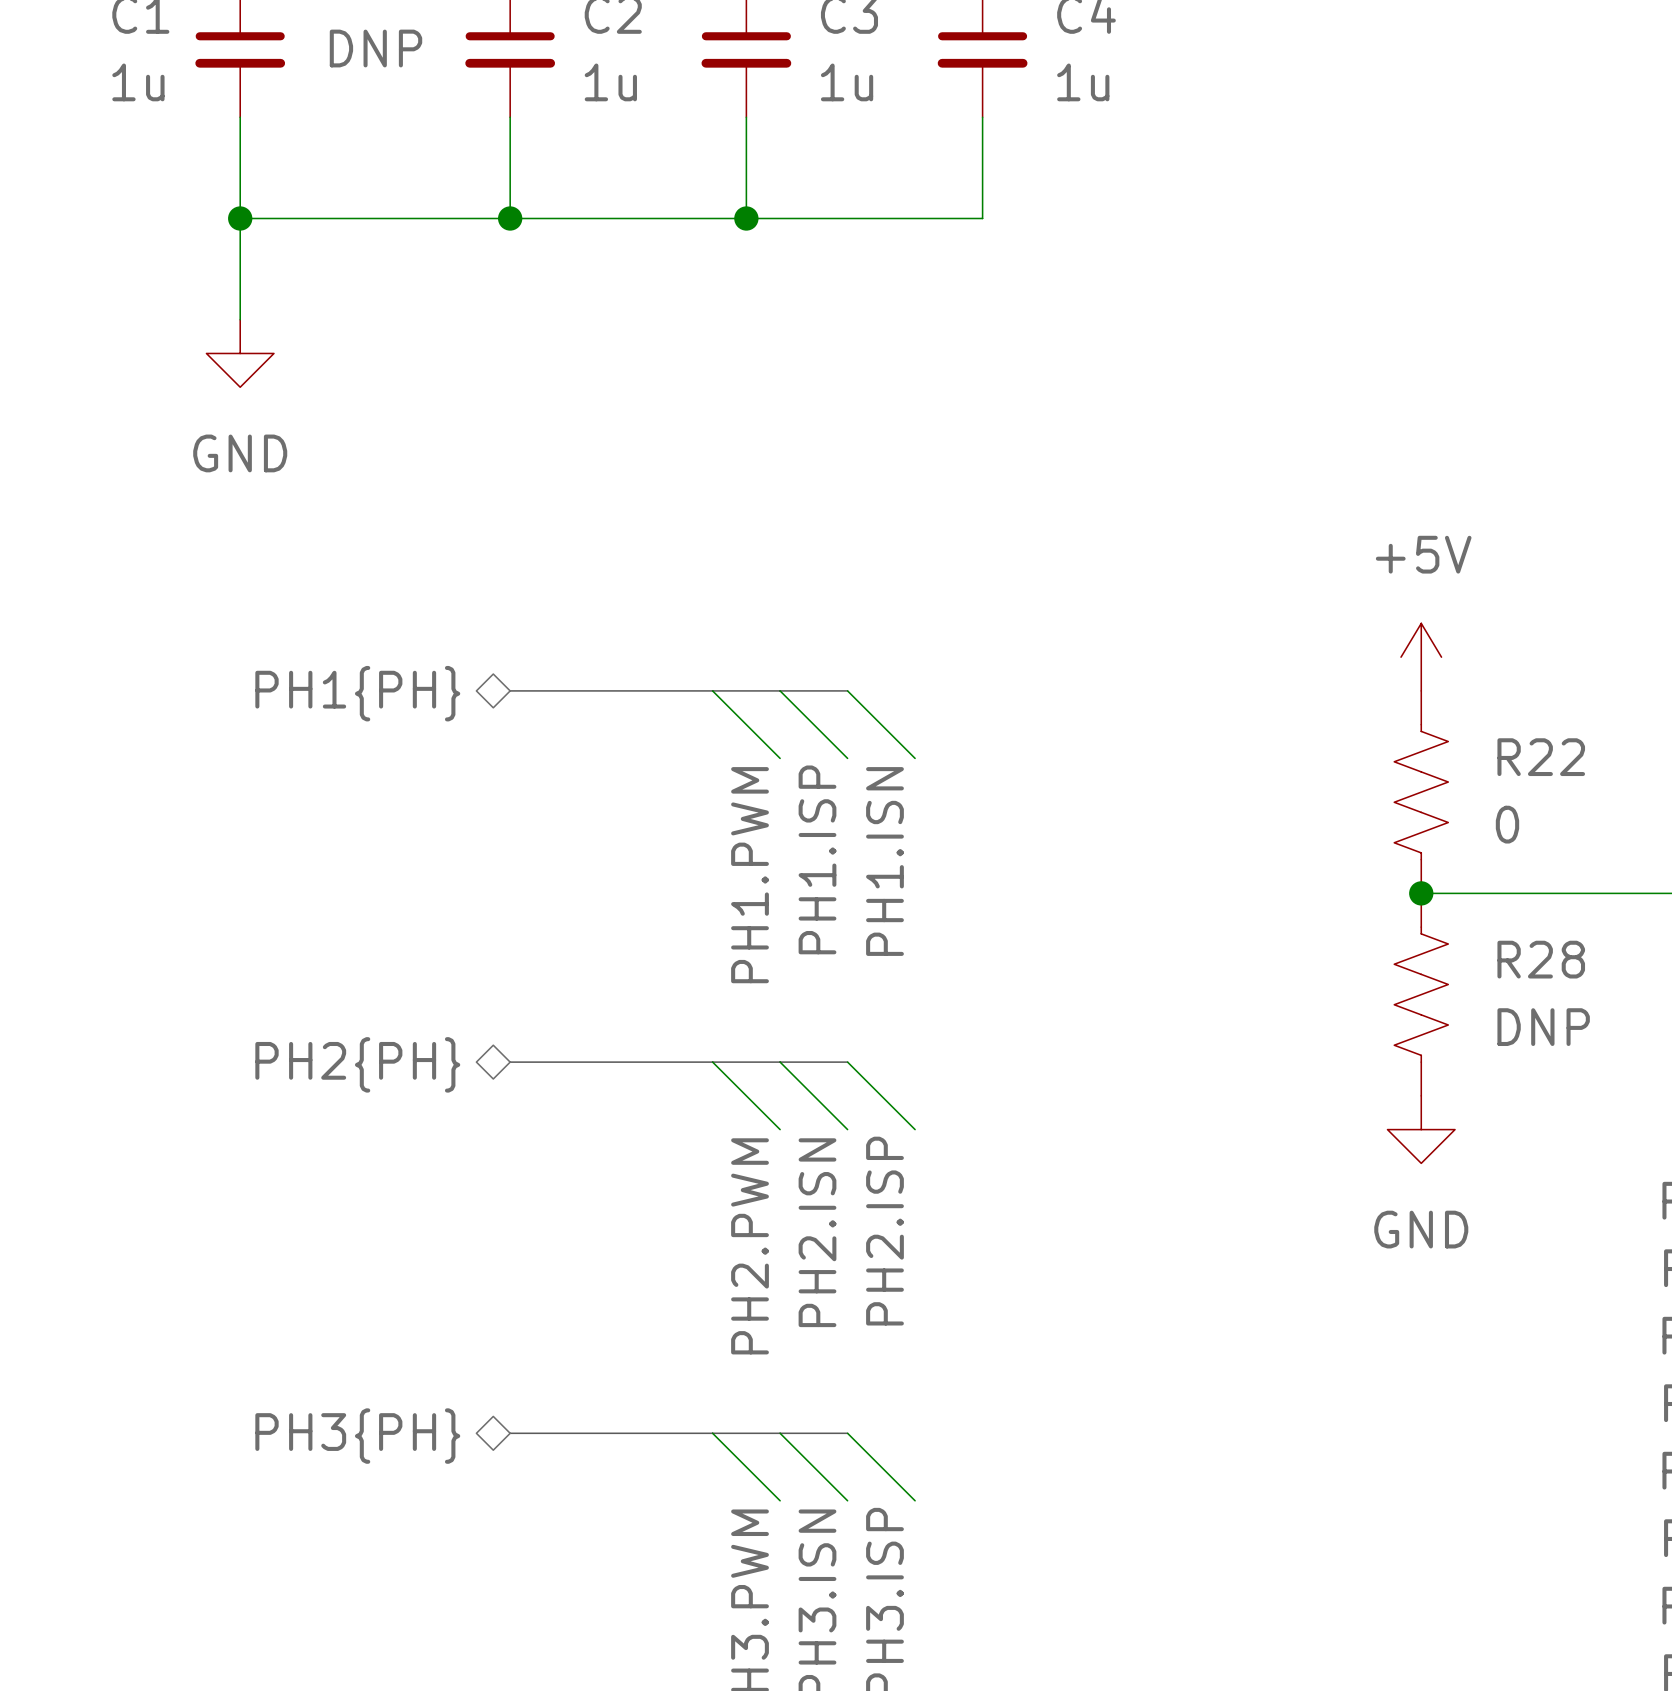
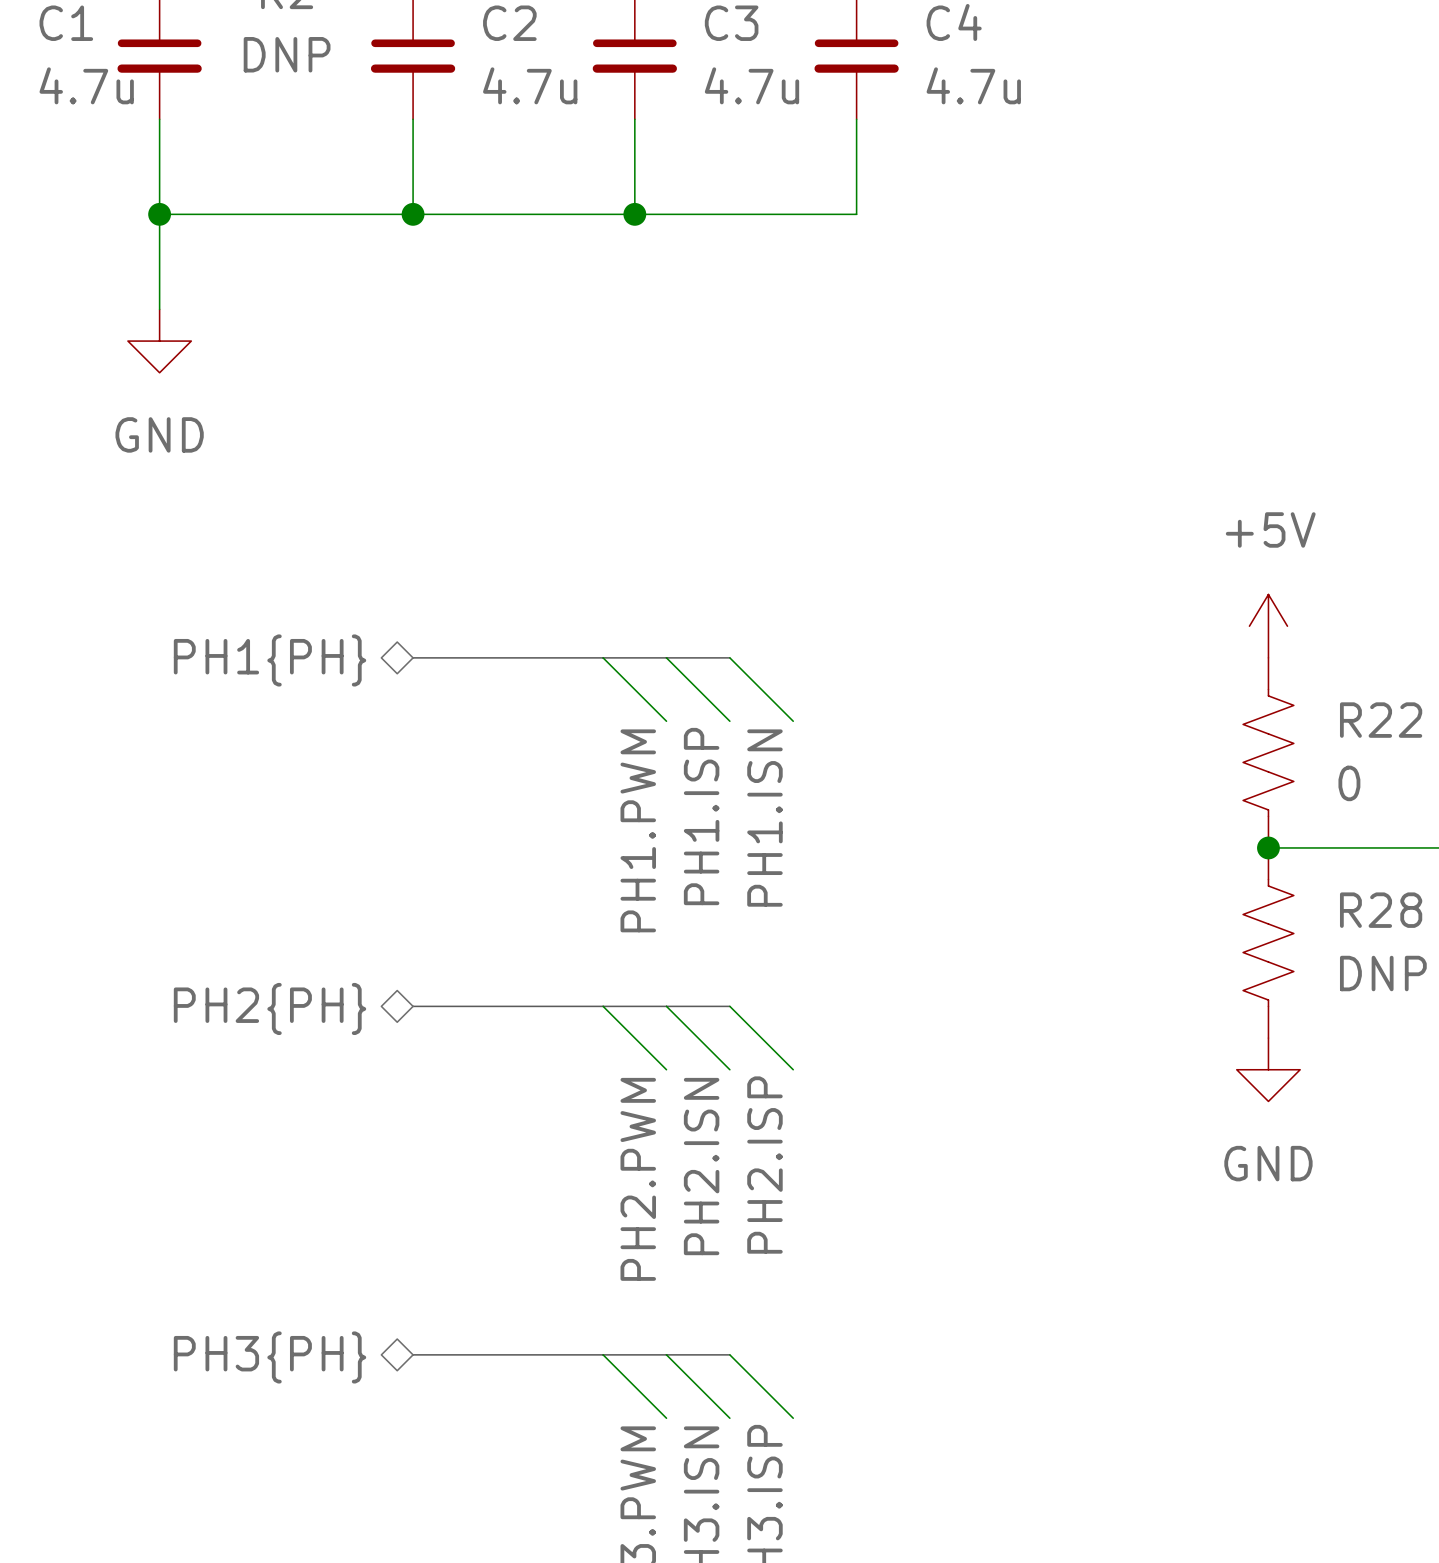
C1 value: 1u (138, 82) -> 4.7u (86, 85)
C2 value: 1u (610, 82) -> 4.7u (530, 85)
C3 value: 1u (847, 82) -> 4.7u (751, 85)
C4 value: 1u (1083, 82) -> 4.7u (973, 85)

